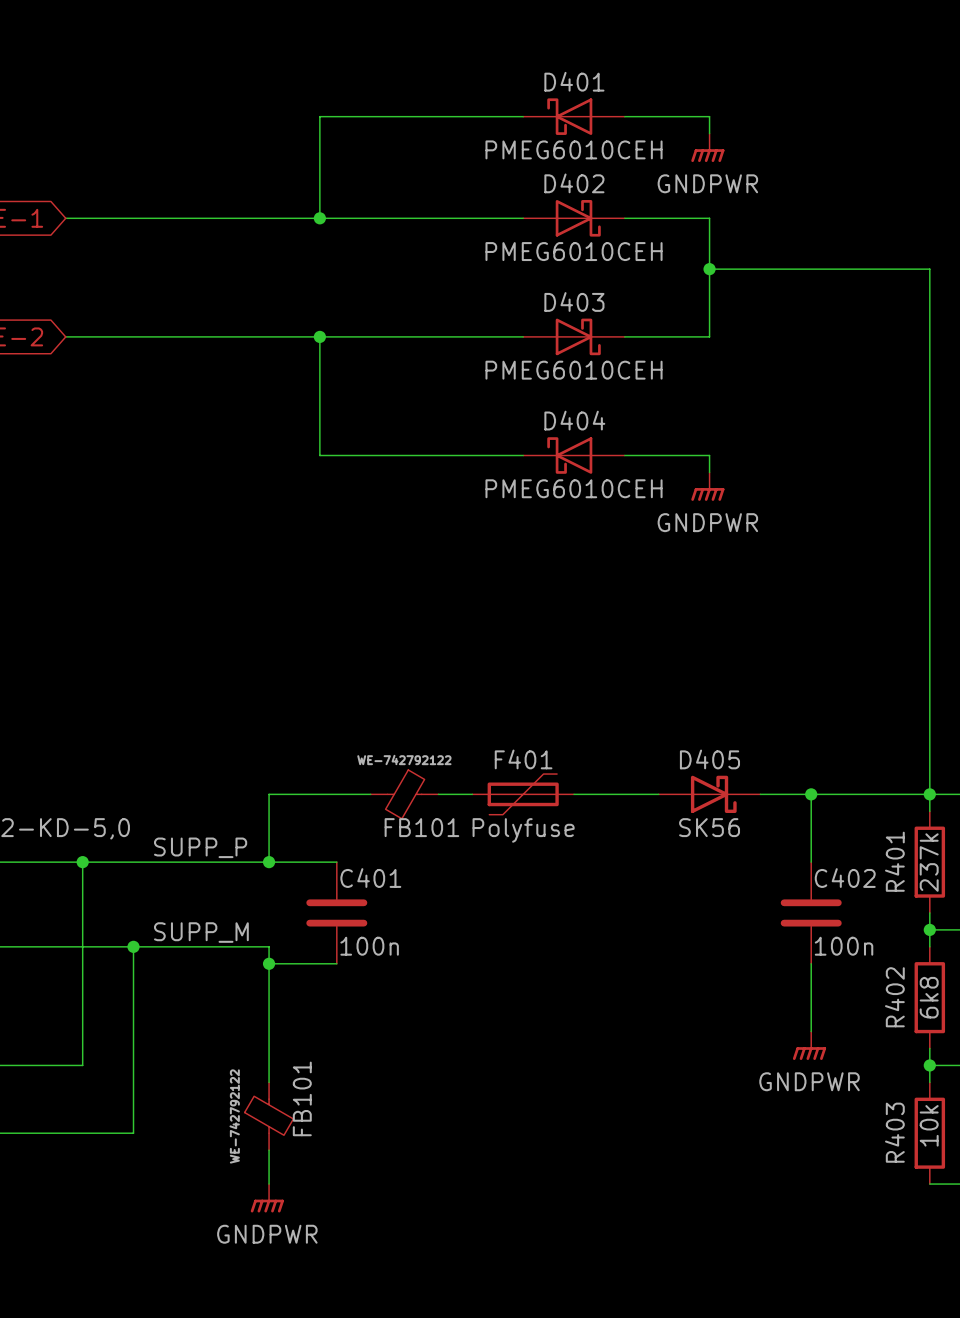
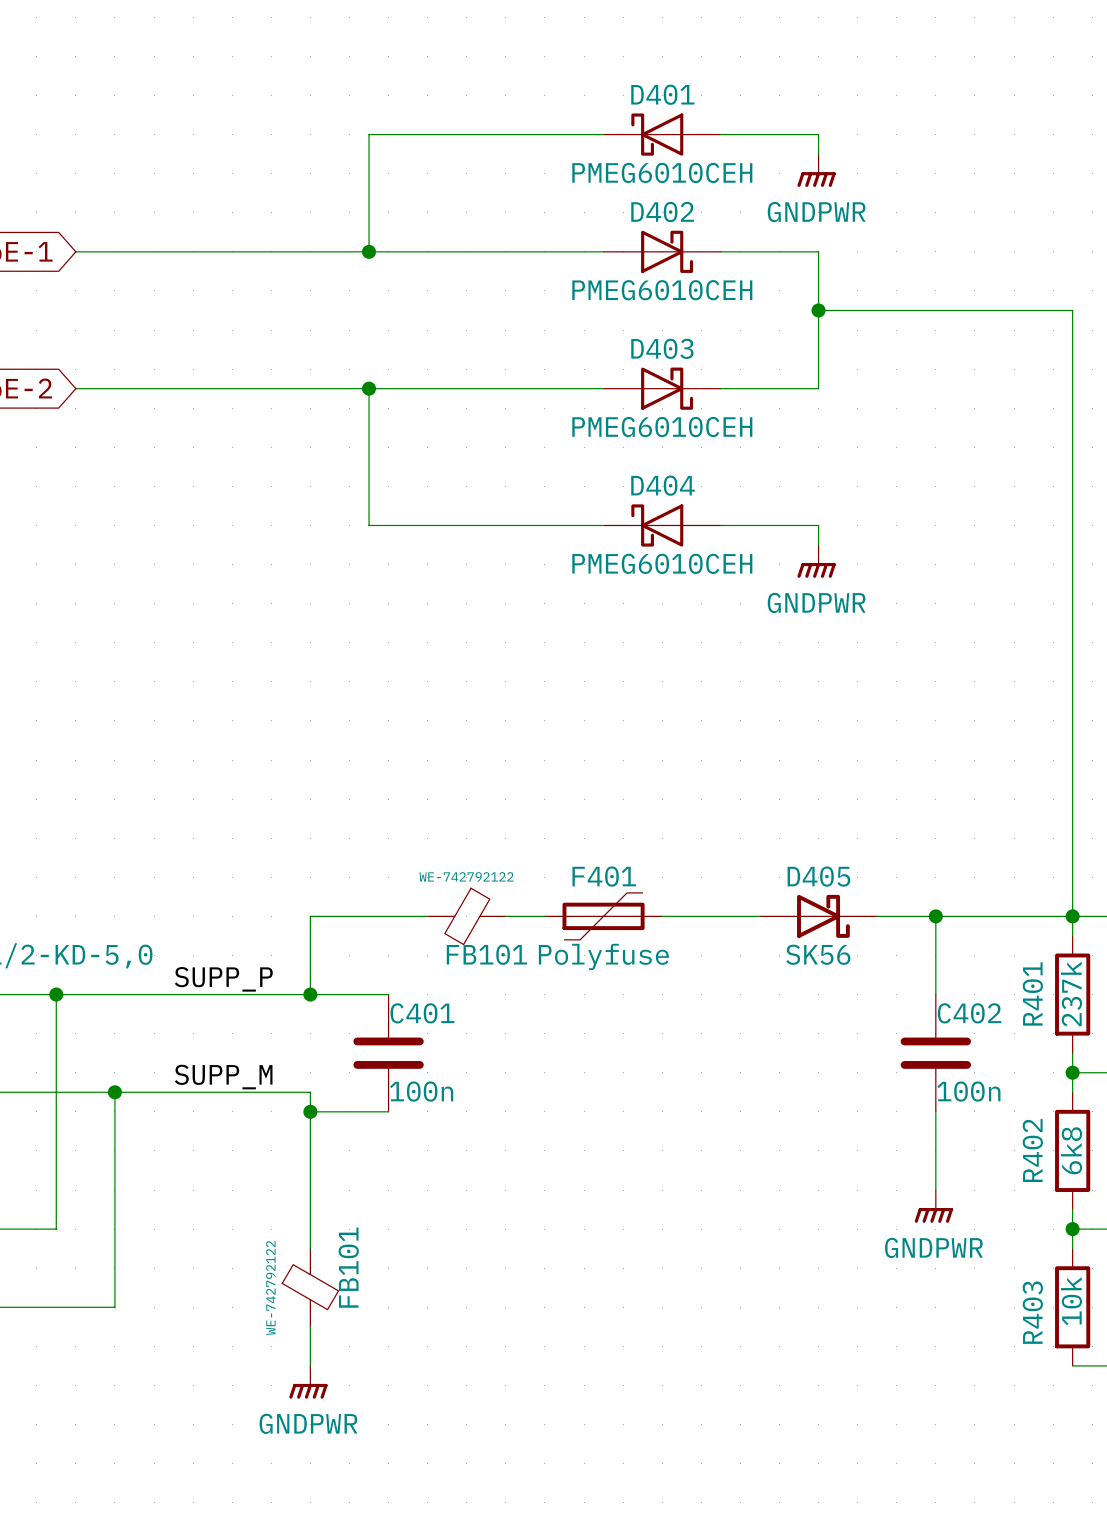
wire: (82, 862) (82, 1065) (48, 1065) -> (56, 994) (56, 1229)
junction position: (82, 862) -> (56, 994)
wire: (133, 946) (133, 1133) (99, 1133) -> (114, 1092) (114, 1307)
junction position: (133, 946) -> (114, 1092)

